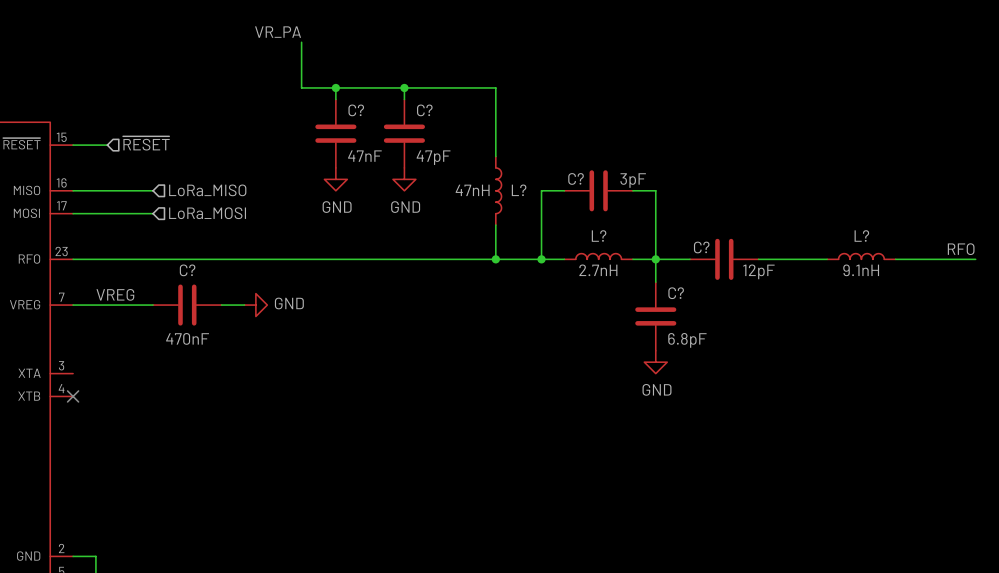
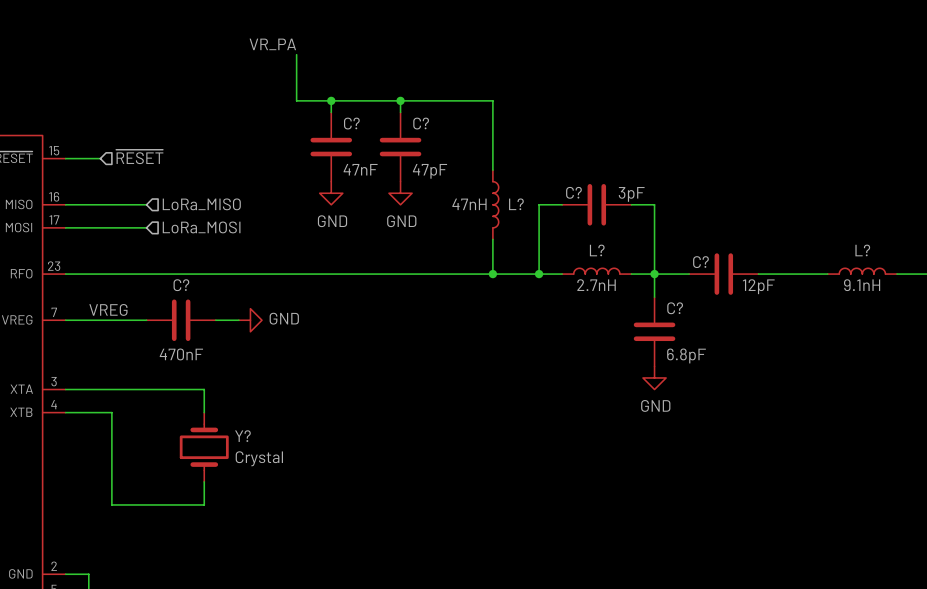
wire: none -> (65, 389) (204, 389) (204, 412)
wire: none -> (65, 412) (111, 412) (111, 504) (204, 504) (204, 481)
no-connect mark: (73, 396) -> none
Y?: none -> Crystal (204, 447)

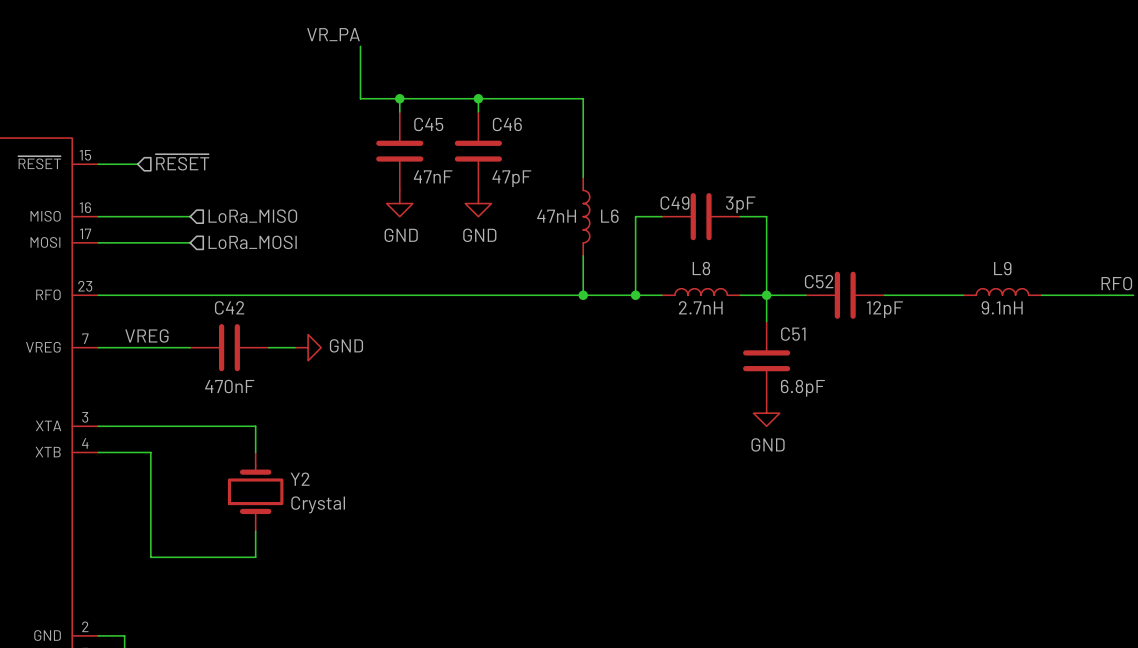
C? name: C? (351, 123) -> C45 (428, 124)
C? name: C? (421, 123) -> C46 (507, 124)
C? name: C? (573, 192) -> C49 (674, 203)
L? name: L? (516, 204) -> L6 (609, 216)
L? name: L? (597, 250) -> L8 (701, 268)
L? name: L? (862, 250) -> L9 (1002, 268)
C? name: C? (700, 262) -> C52 (819, 281)
C? name: C? (181, 285) -> C42 (229, 307)
C? name: C? (675, 308) -> C51 (793, 334)
Y? name: Y? (242, 436) -> Y2 (300, 479)

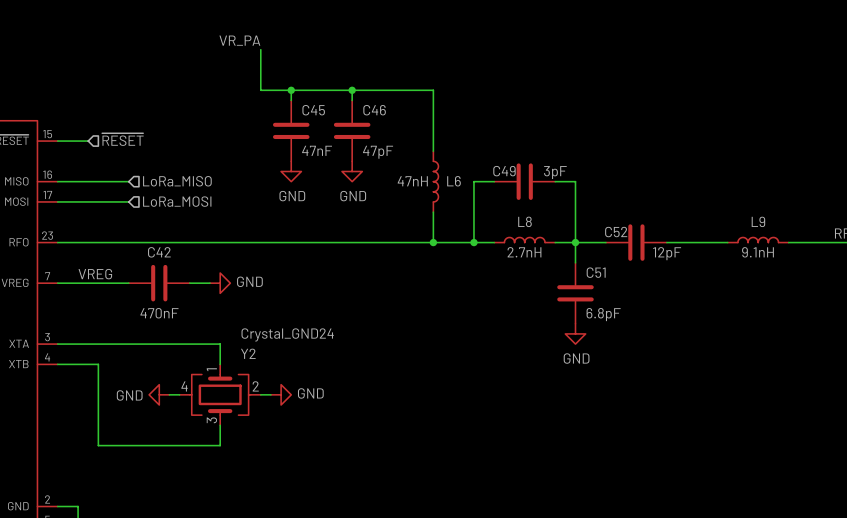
wire: (255, 426) (255, 452) -> (179, 344) (220, 344) (220, 364)
Y2 symbol: [227, 452, 284, 532] -> [179, 364, 261, 426]
Y2 name position: Y2 (300, 479) -> Y2 (248, 353)
power symbol: none -> GND (159, 394)
wire: none -> (169, 394) (179, 394)
wire: none -> (260, 394) (270, 394)
power symbol: none -> GND (281, 394)
Y2 value: Crystal (318, 504) -> Crystal_GND24 (287, 334)
wire: (255, 531) (255, 557) -> (220, 425) (220, 445) (179, 445)

